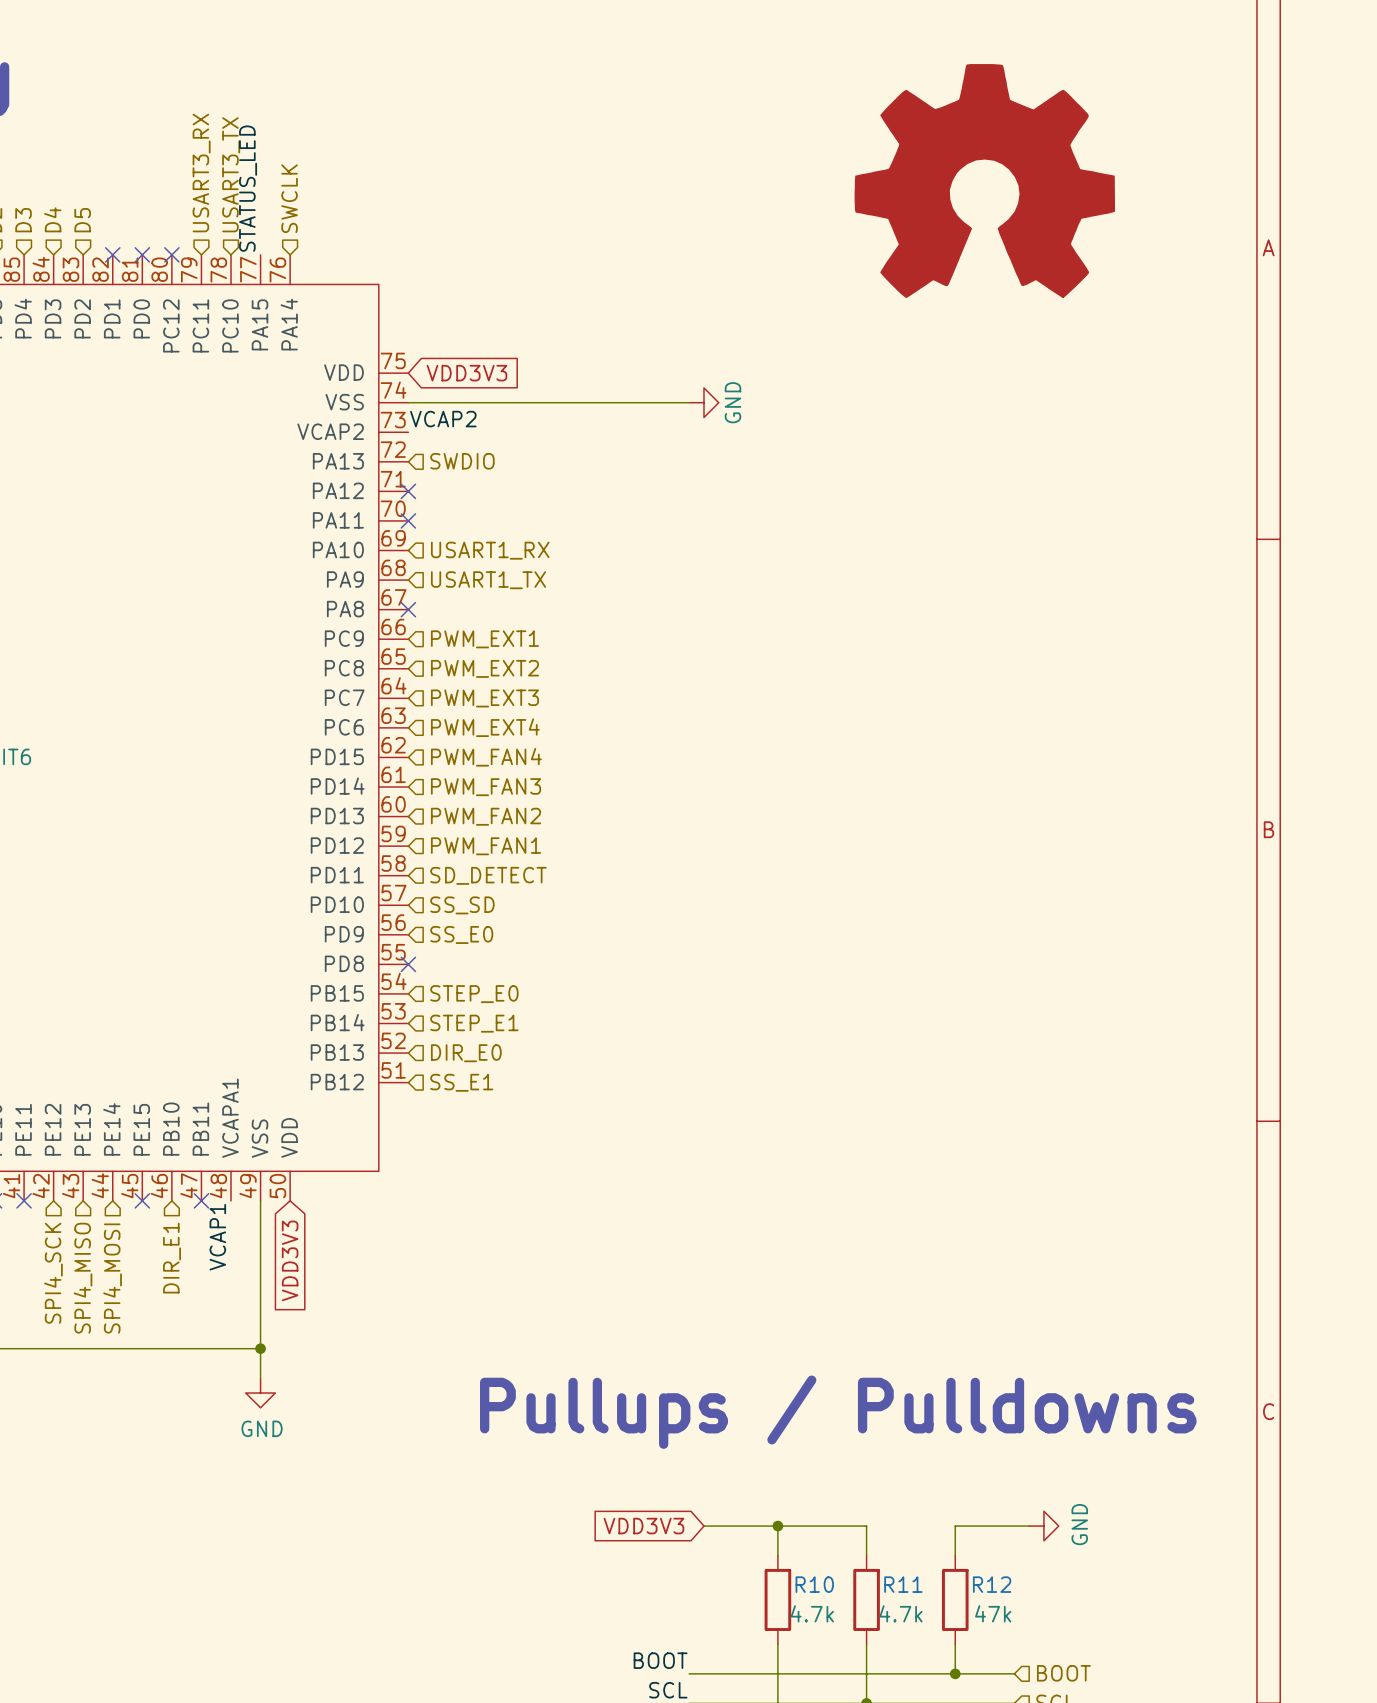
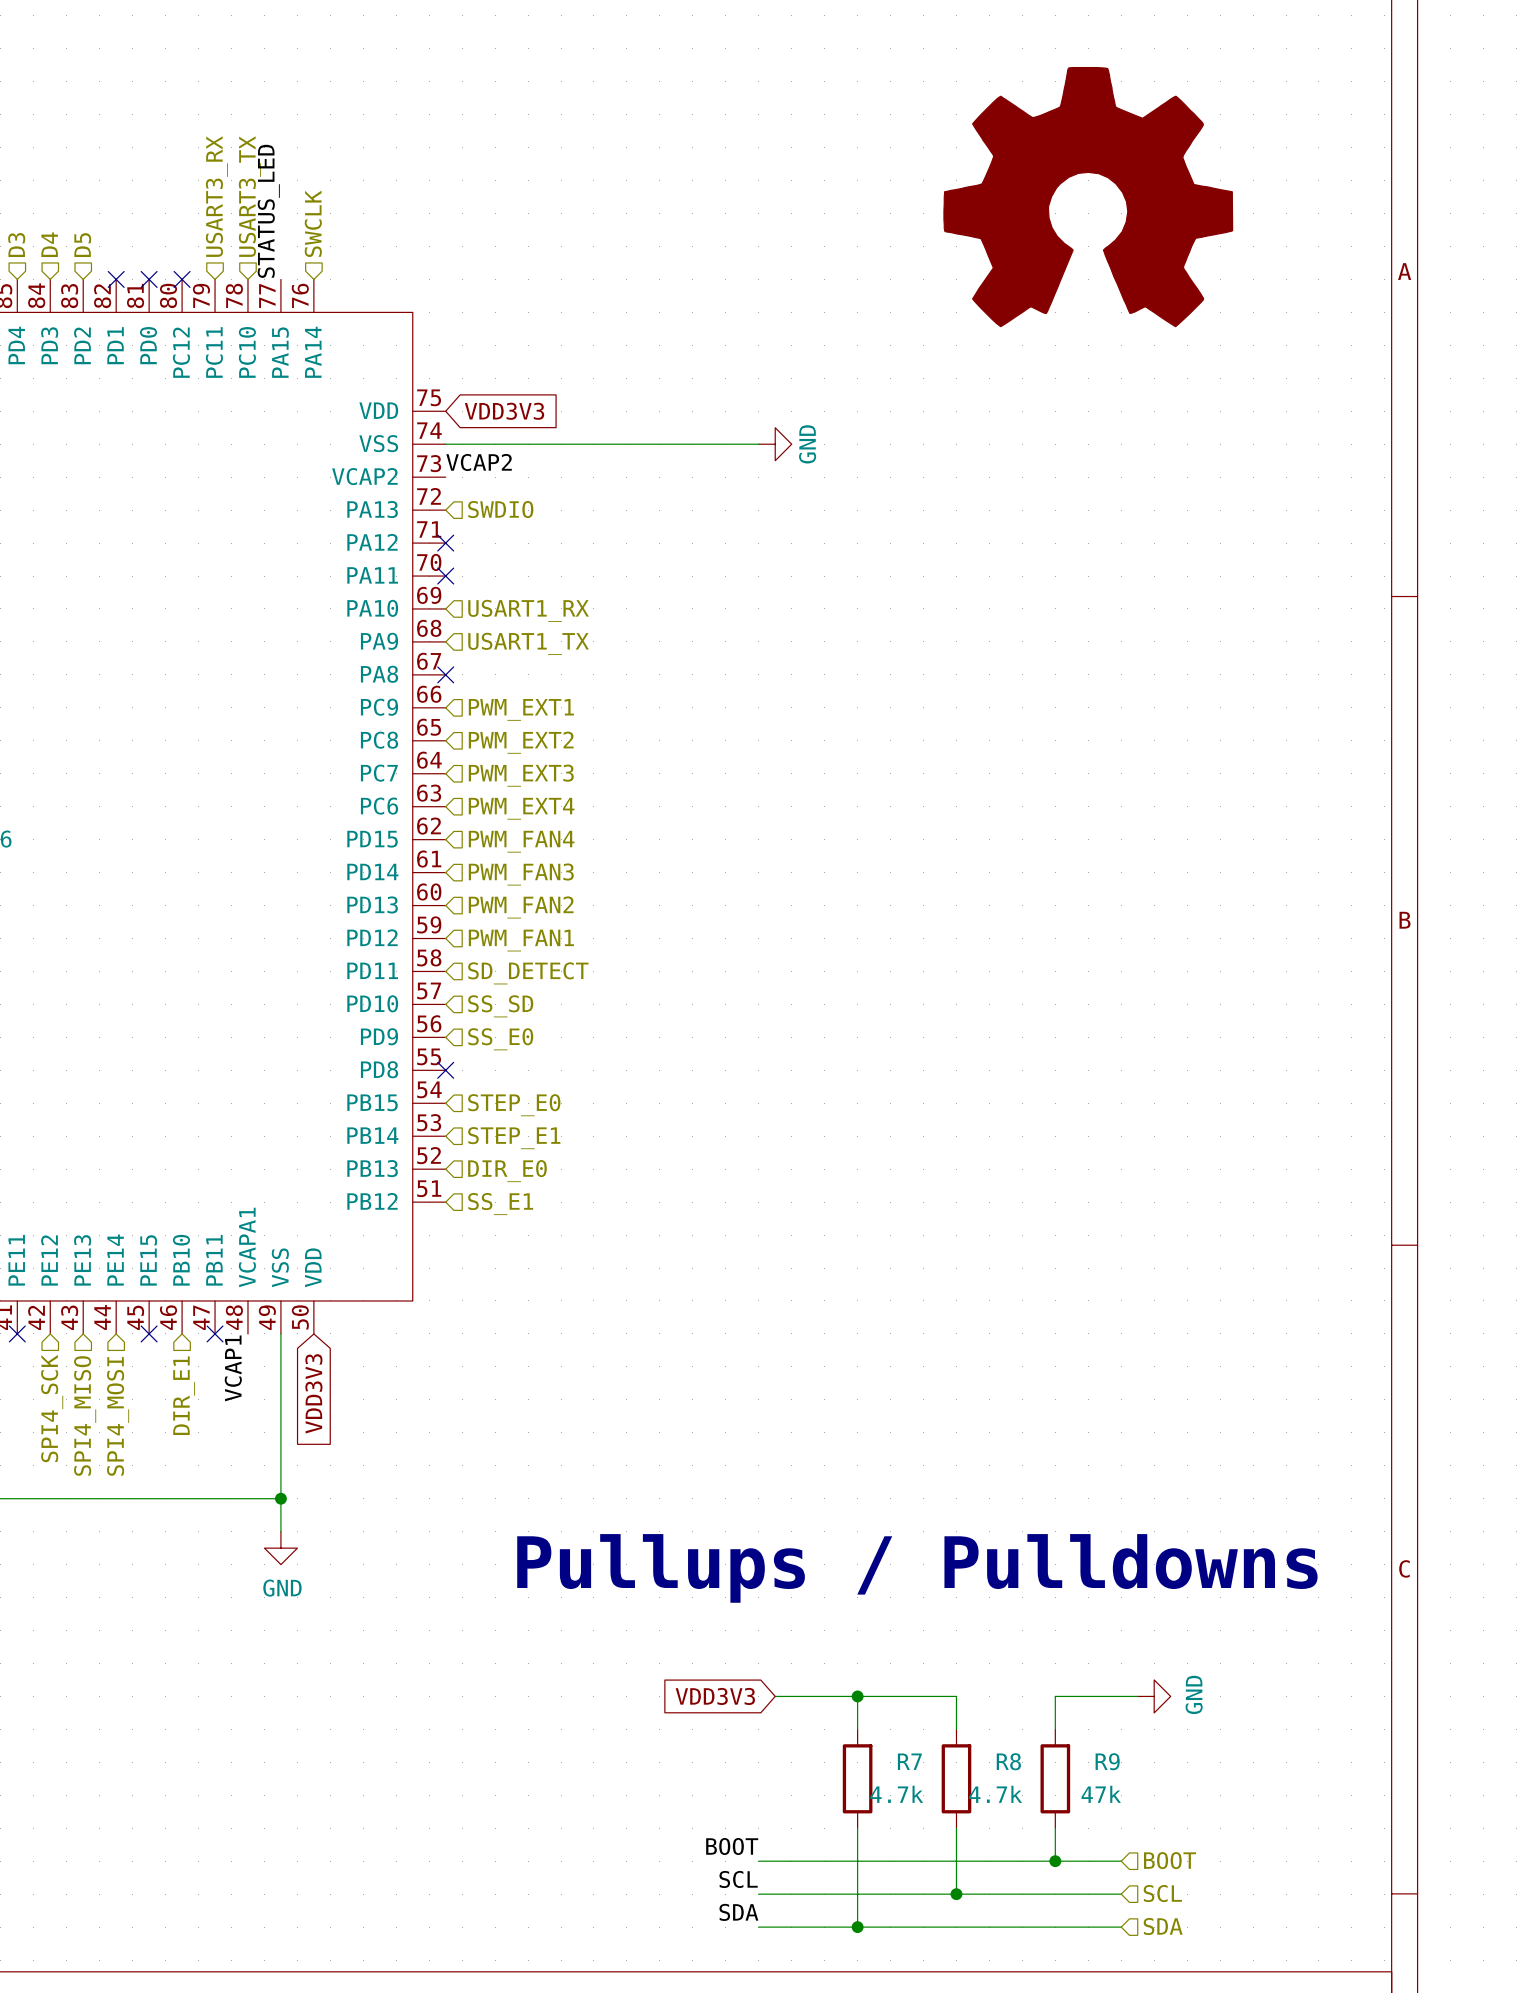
R10 name: R10 (814, 1584) -> R7 (909, 1761)
R11 name: R11 (903, 1584) -> R8 (1008, 1761)
R12 name: R12 (992, 1584) -> R9 (1107, 1761)

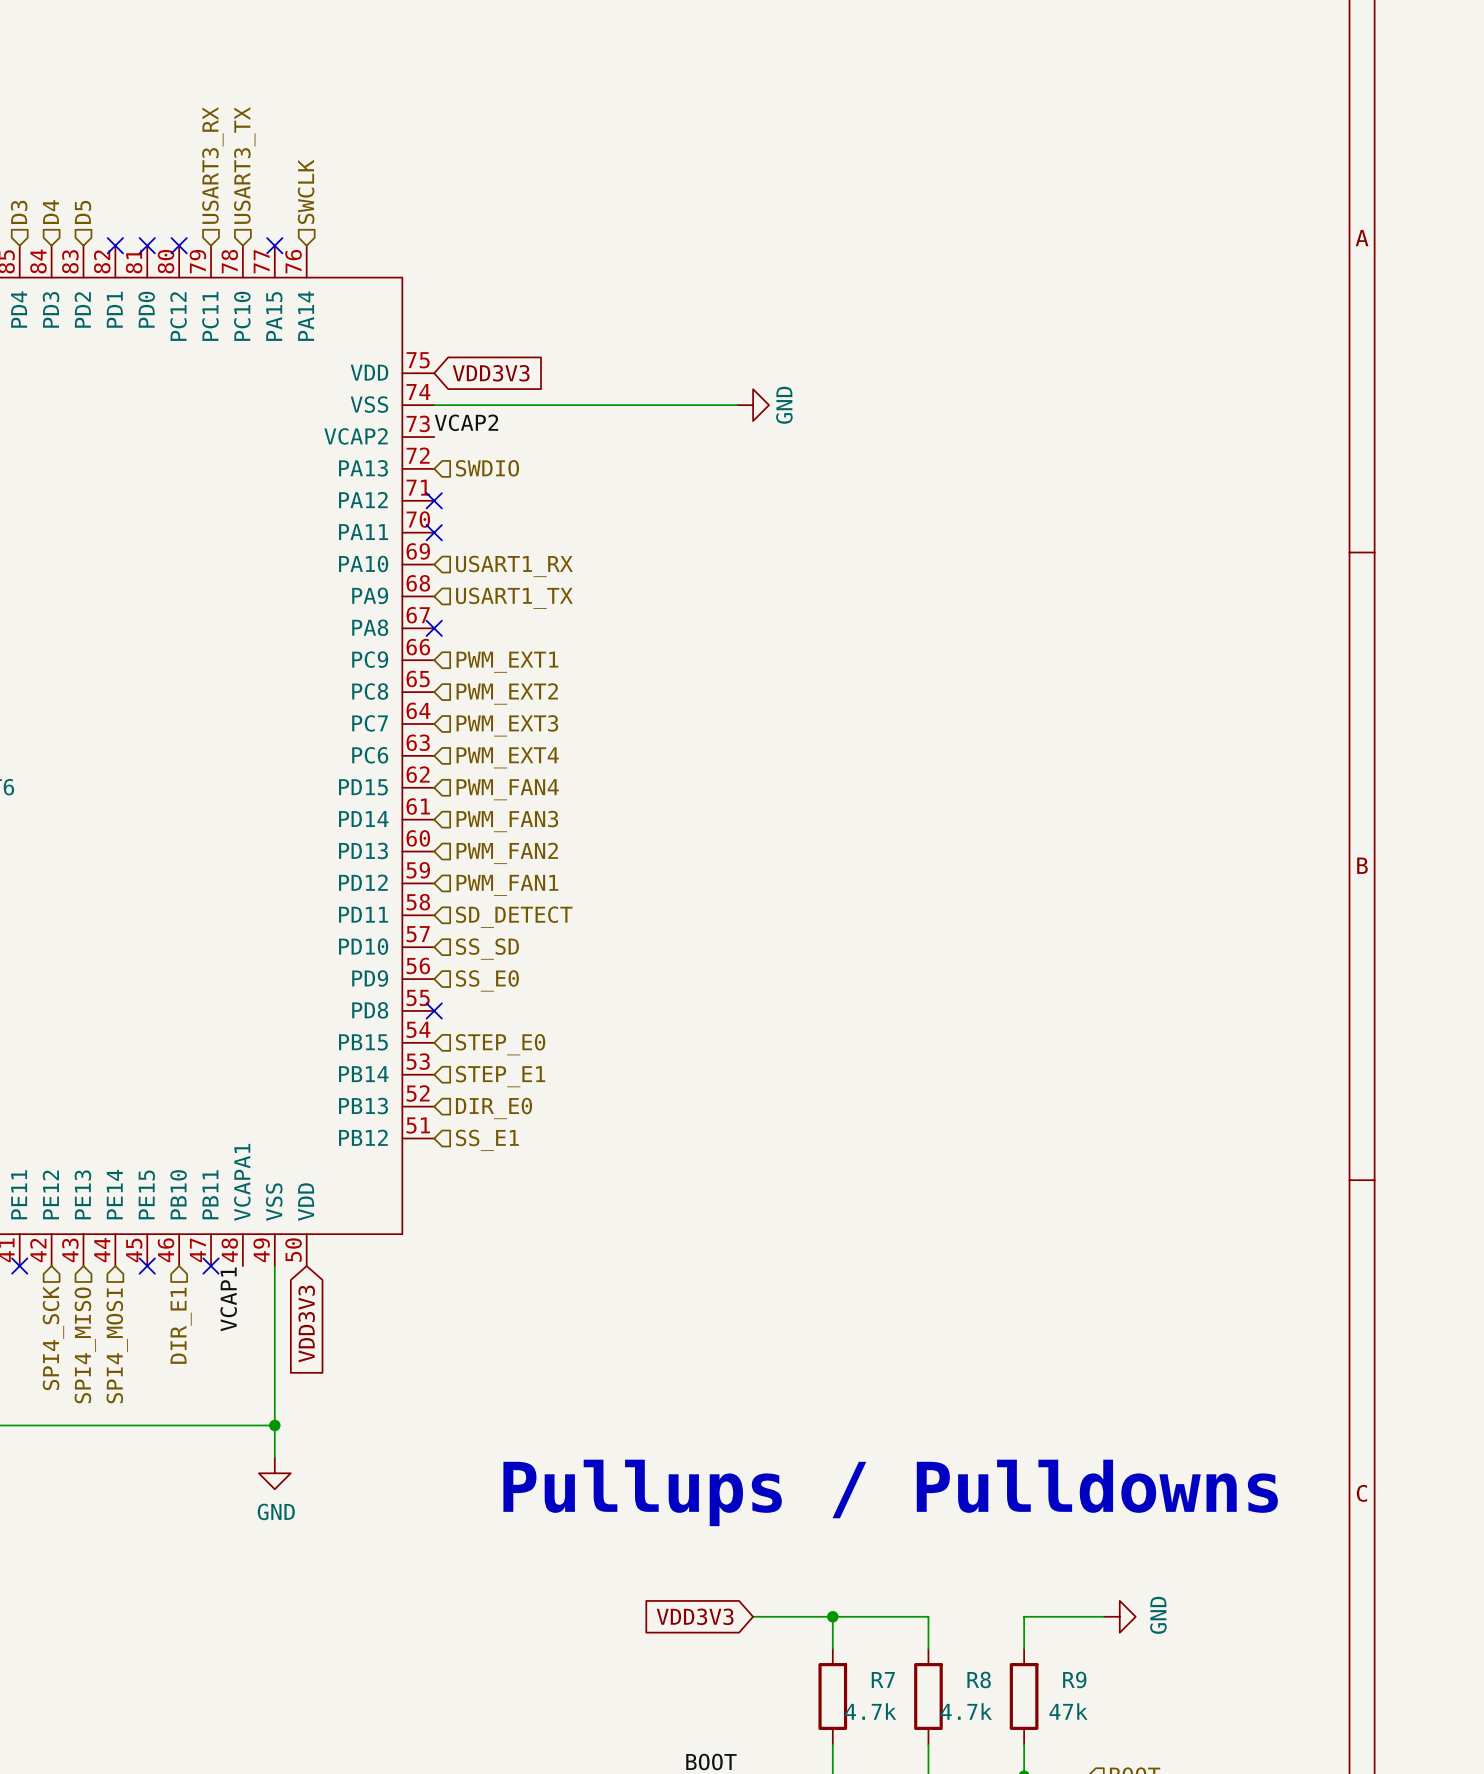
part: (1088, 197) -> none
label: STATUS_LED (268, 211) -> none
no-connect mark: none -> (274, 245)

